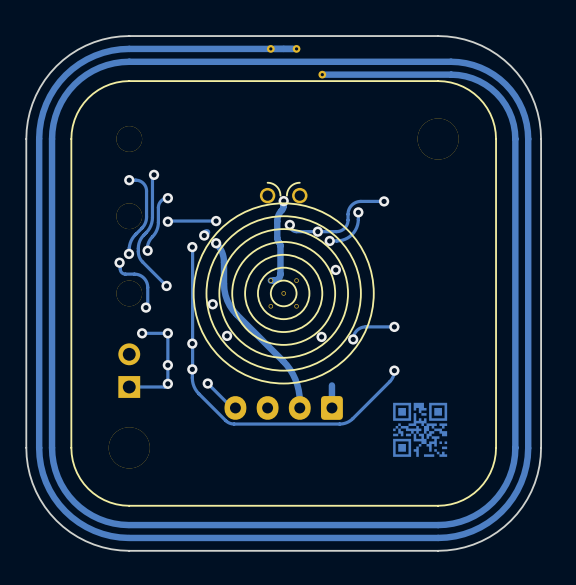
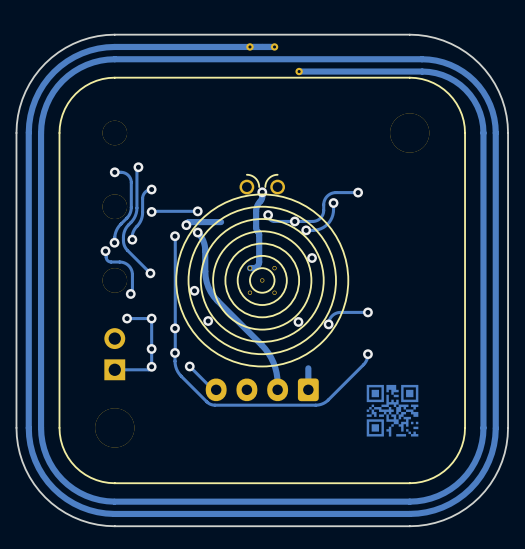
track: none -> (221, 222) (189, 222)

